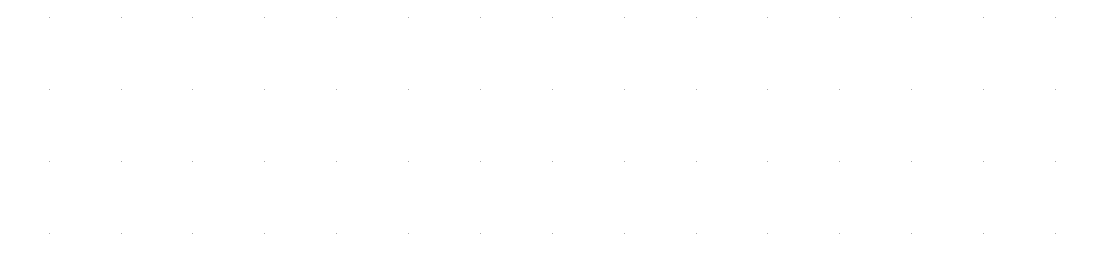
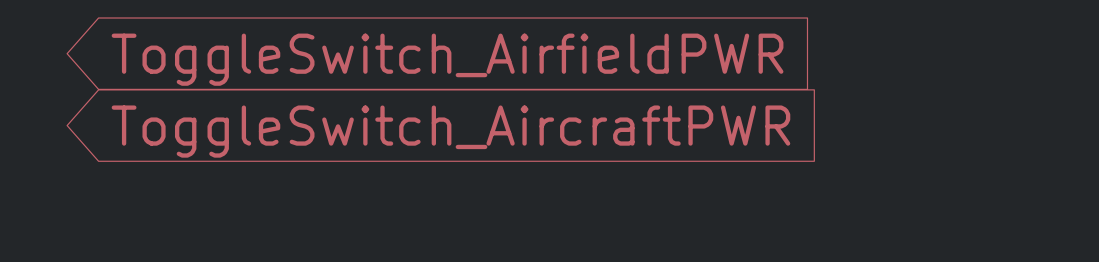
global label: none -> ToggleSwitch_AirfieldPWR (447, 59)
global label: none -> ToggleSwitch_AircraftPWR (450, 131)

